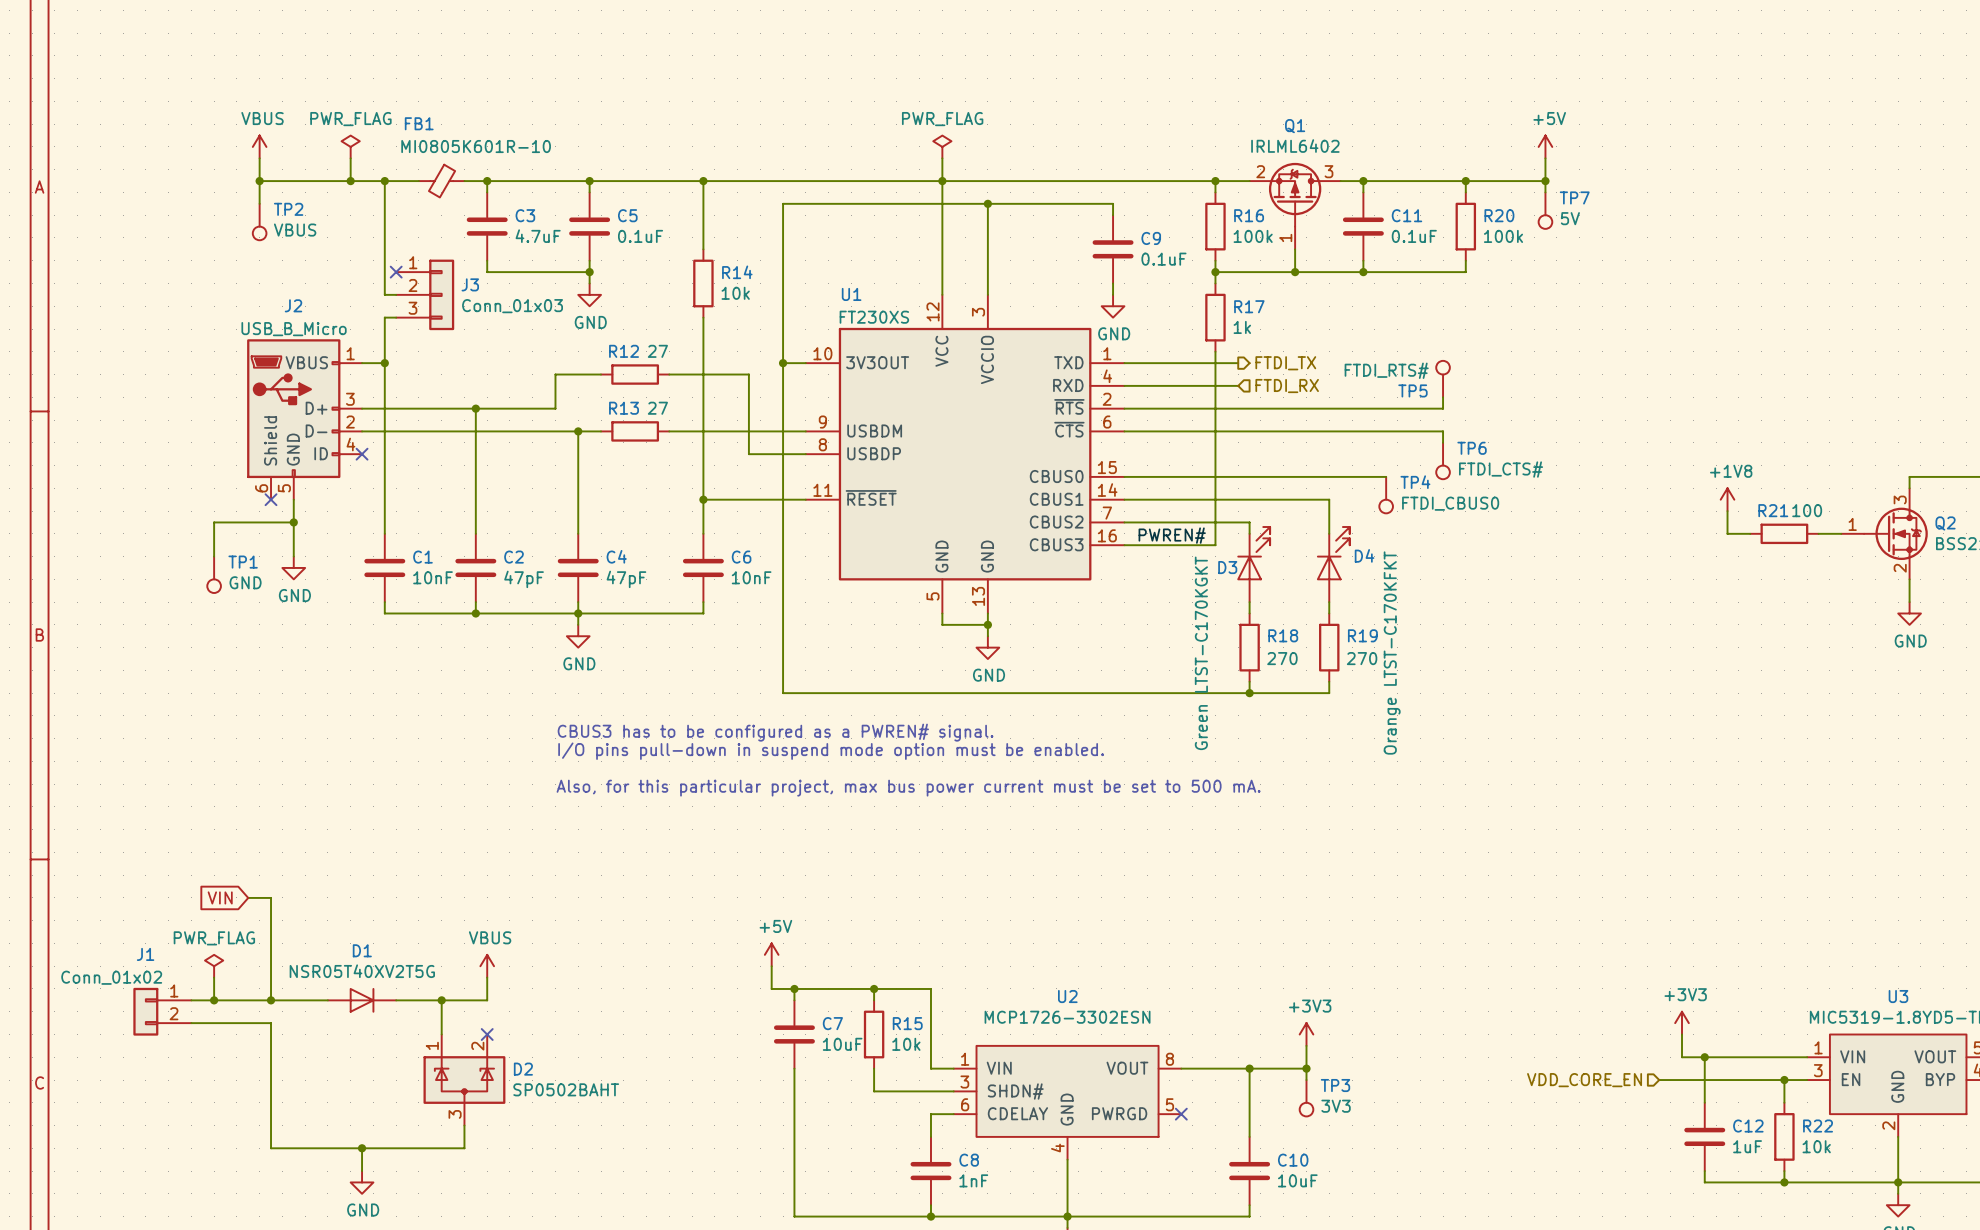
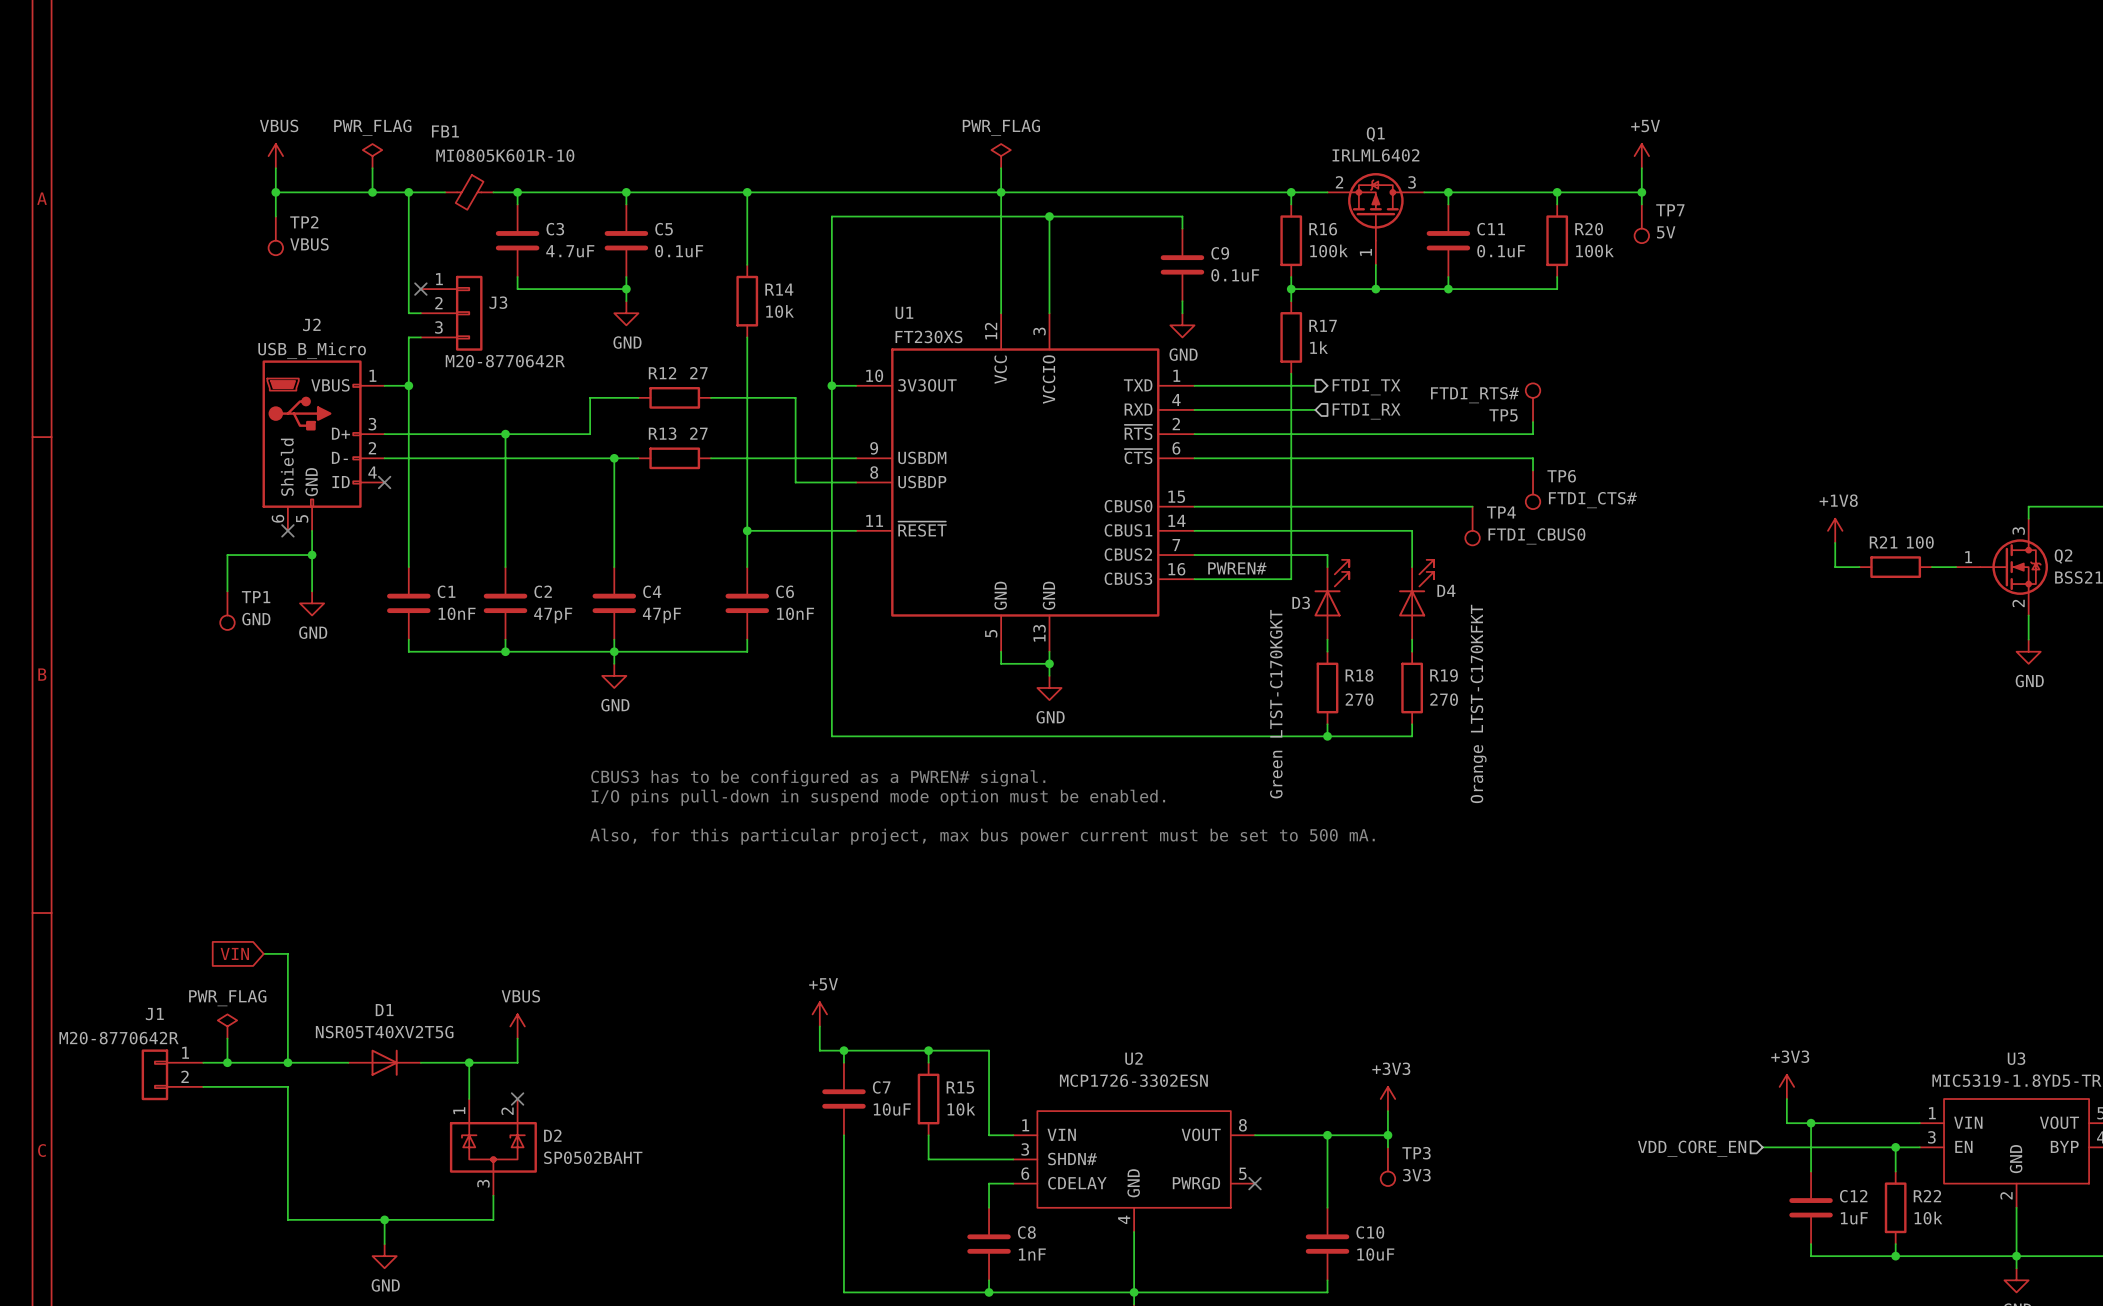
J3 value: Conn_01x03 (512, 306) -> M20-8770642R (505, 361)
J1 value: Conn_01x02 (111, 977) -> M20-8770642R (119, 1038)

